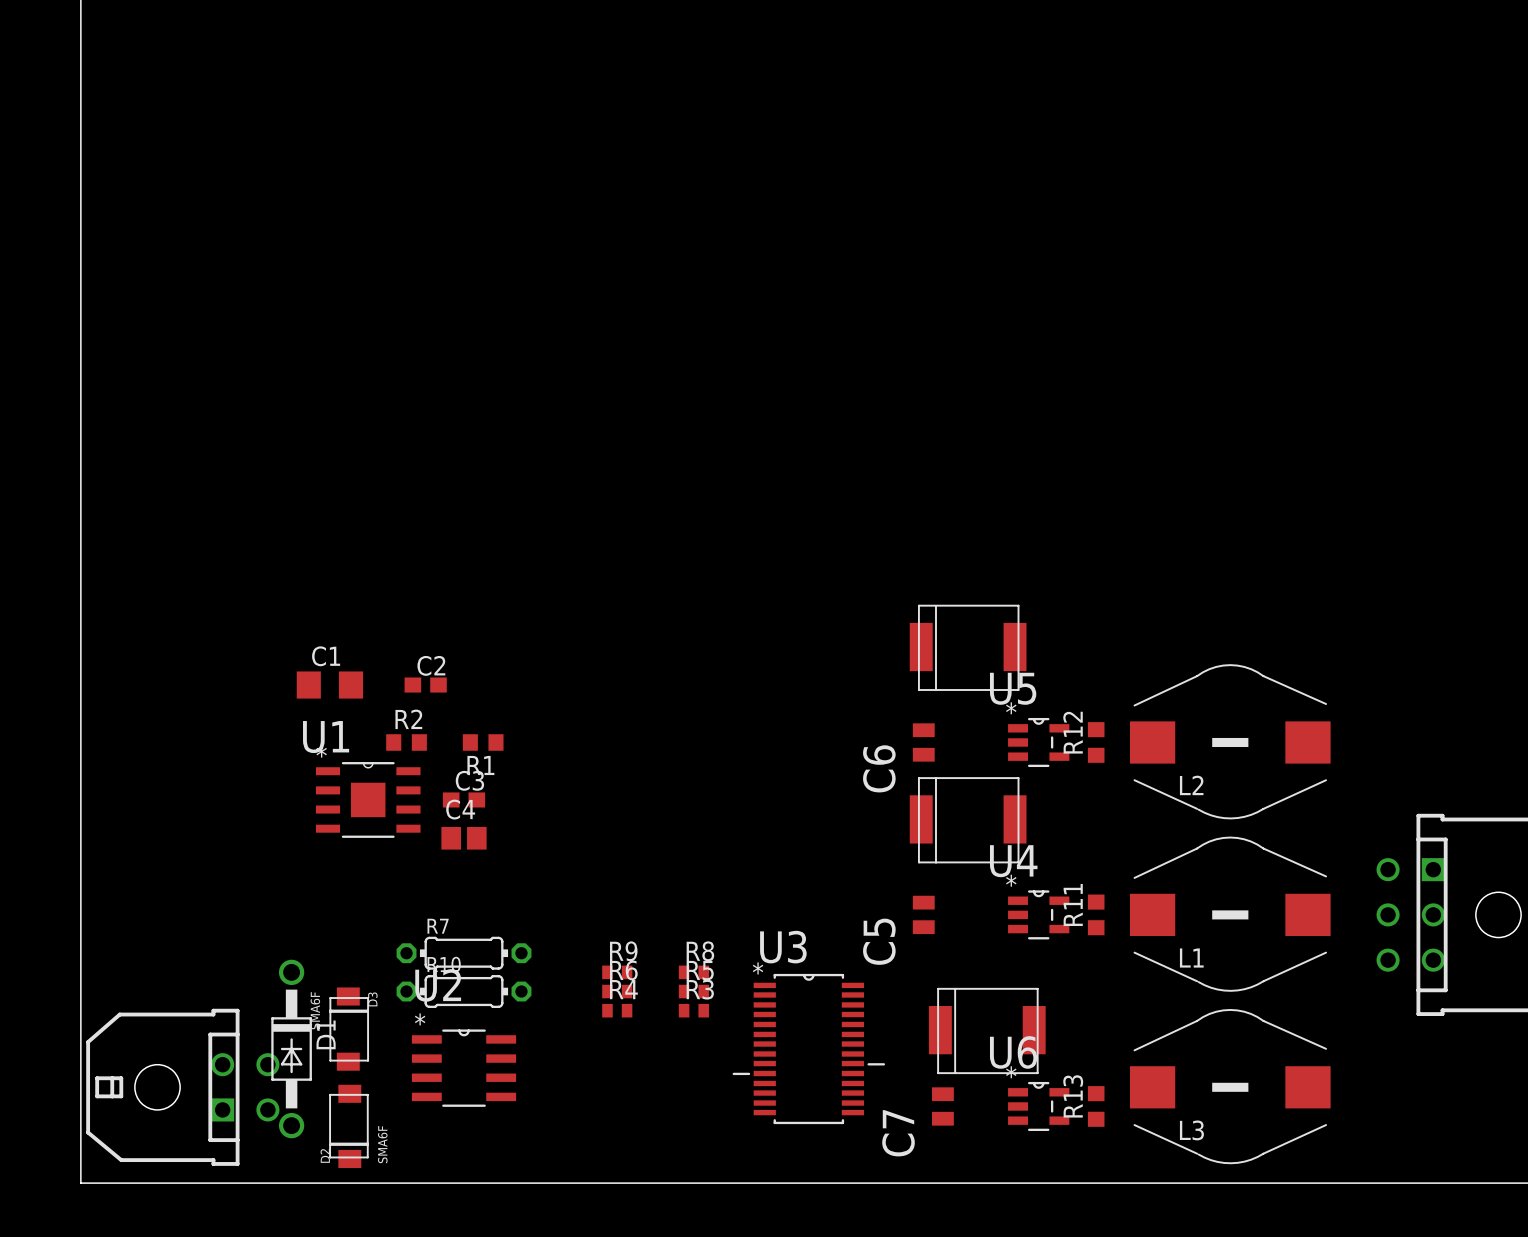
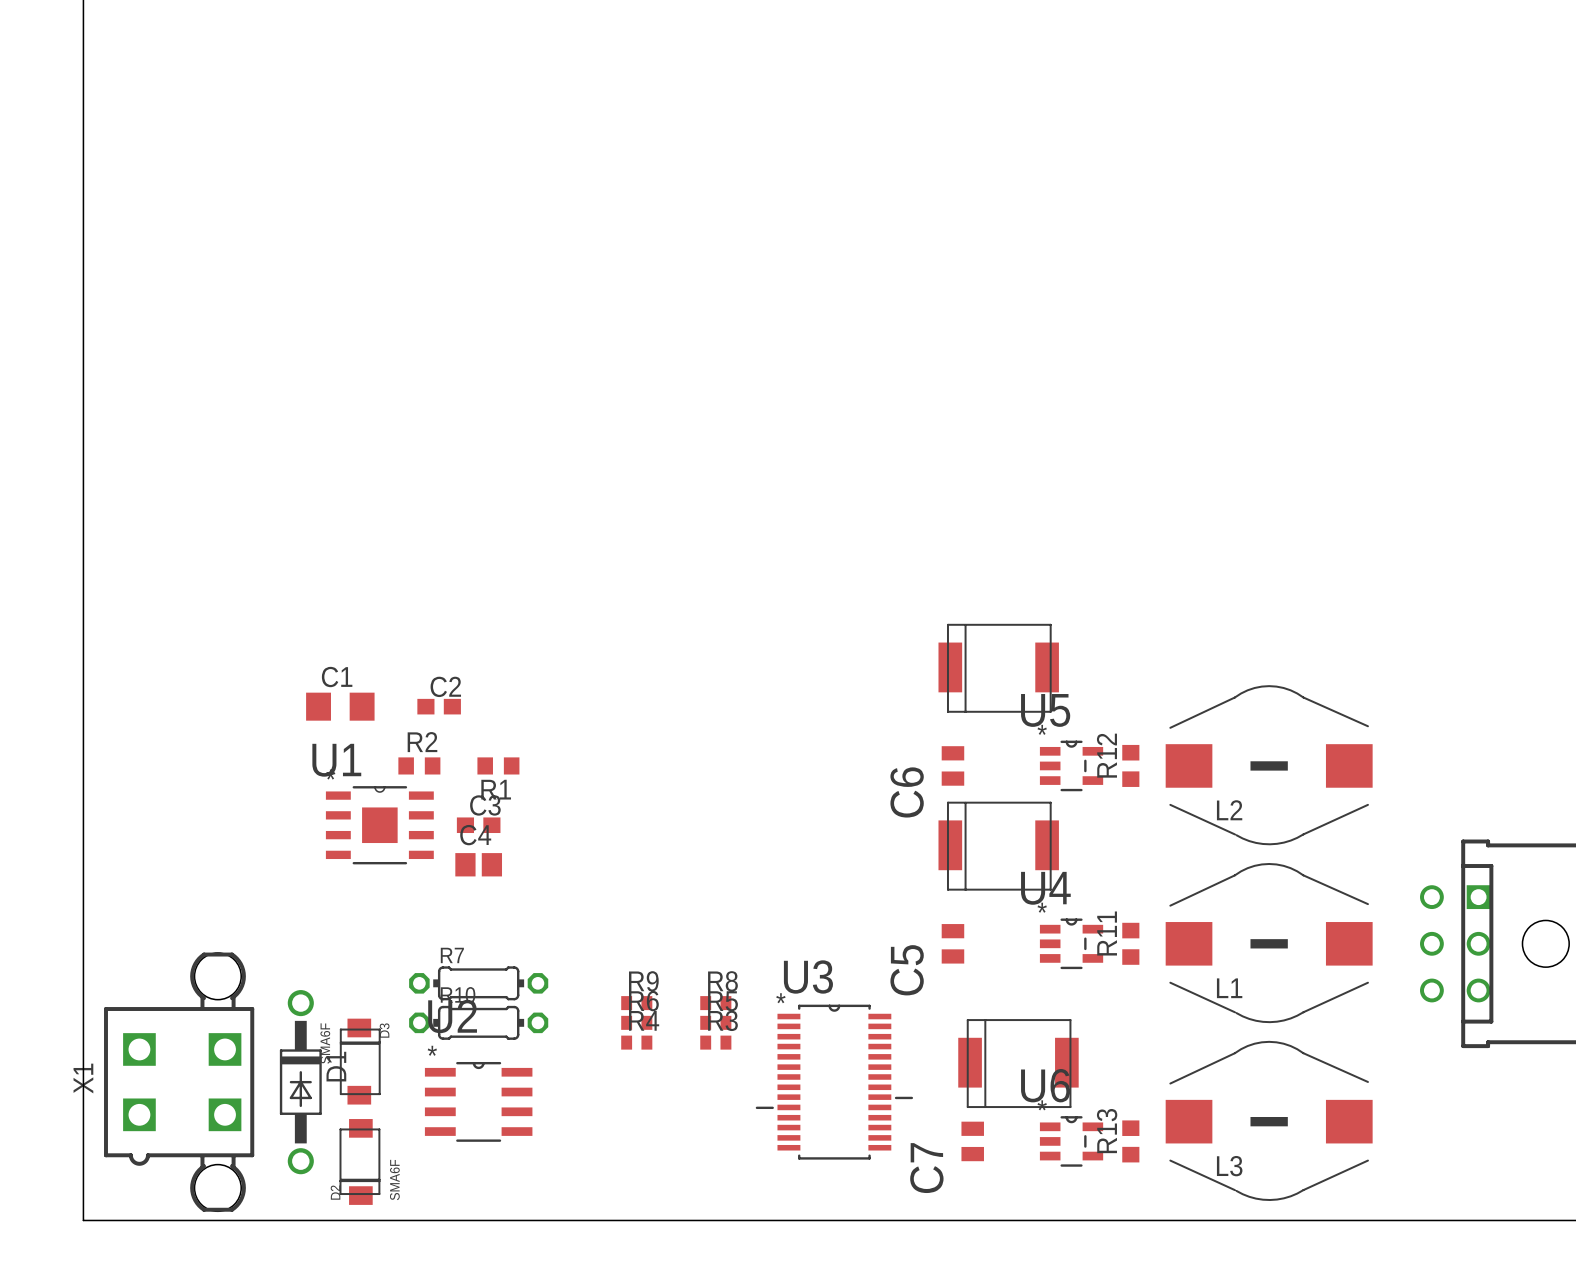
X1: none -> (179, 1082)
part: (182, 1087) -> none

